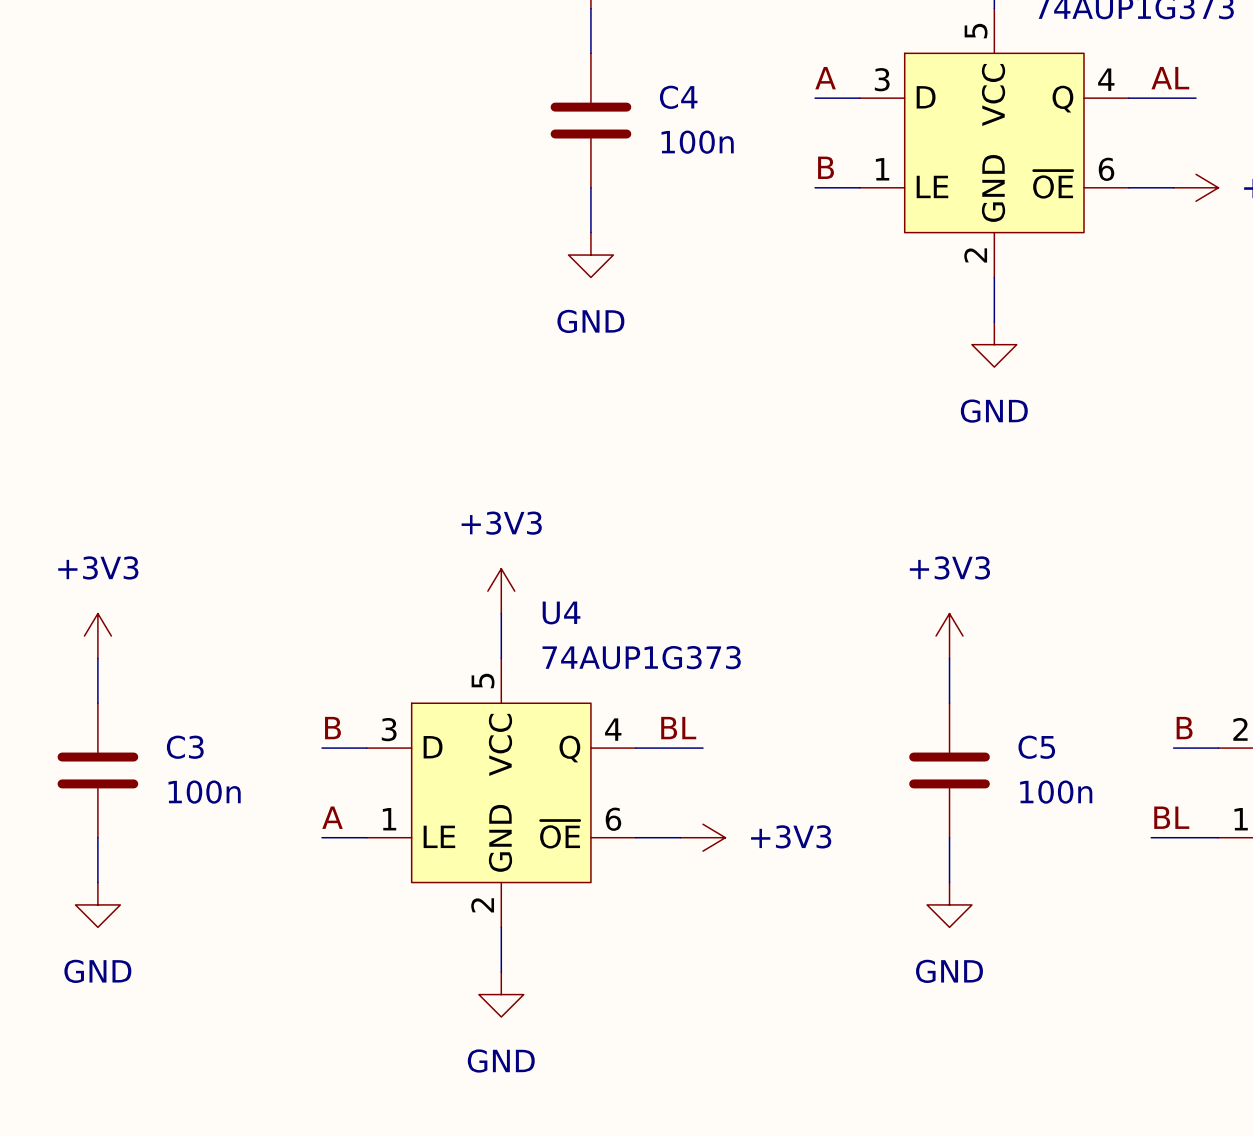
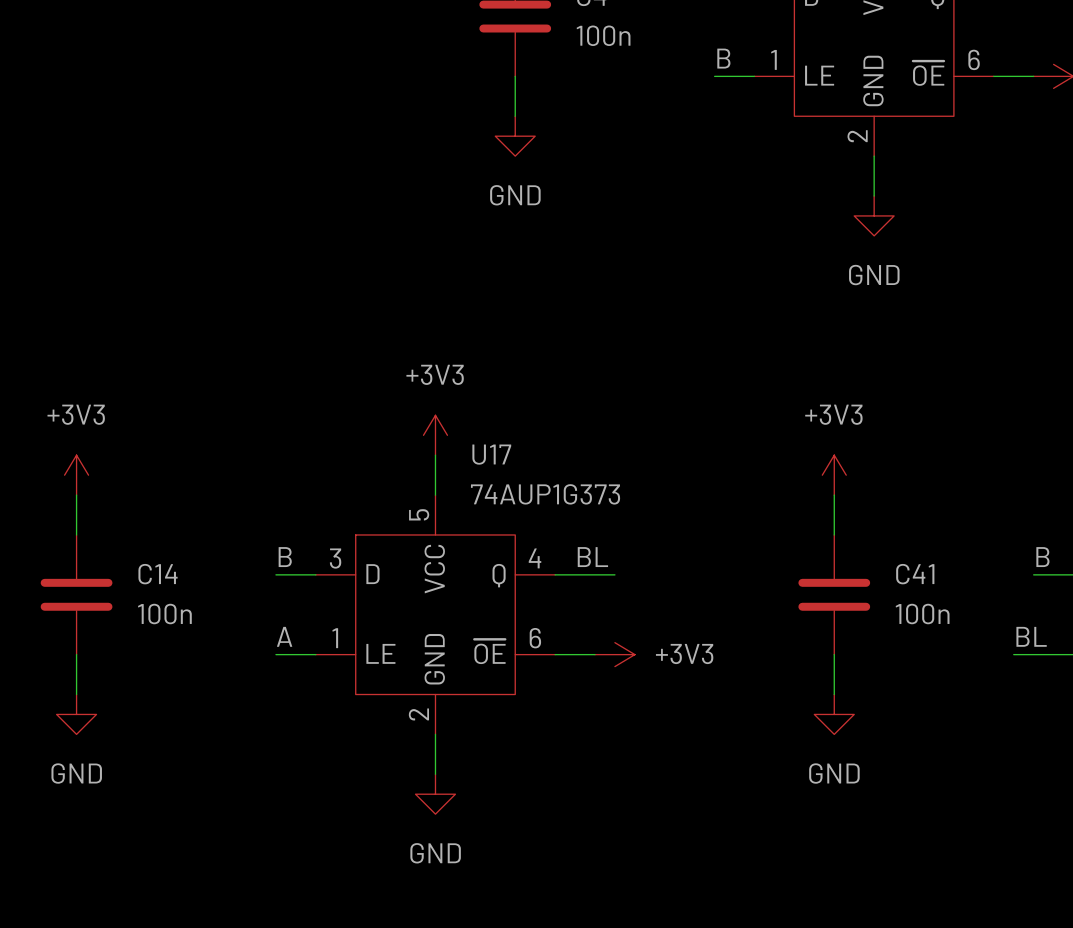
U4 name: U4 (561, 612) -> U17 (491, 454)
C3 name: C3 (185, 747) -> C14 (158, 574)
C5 name: C5 (1036, 747) -> C41 (915, 574)

